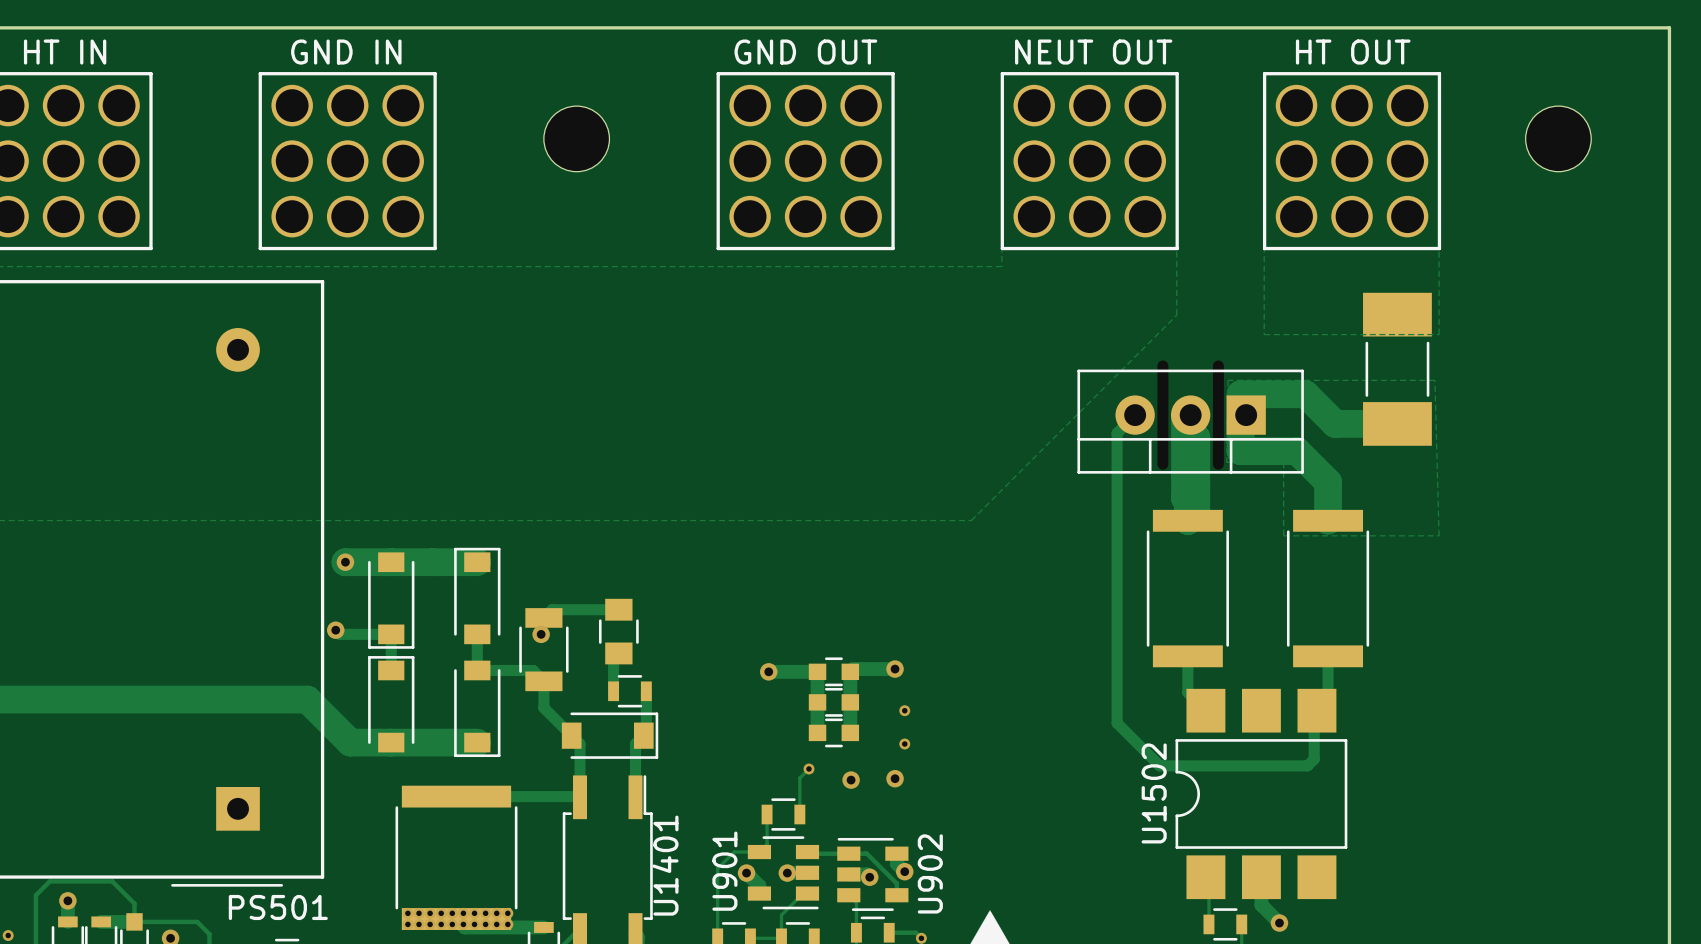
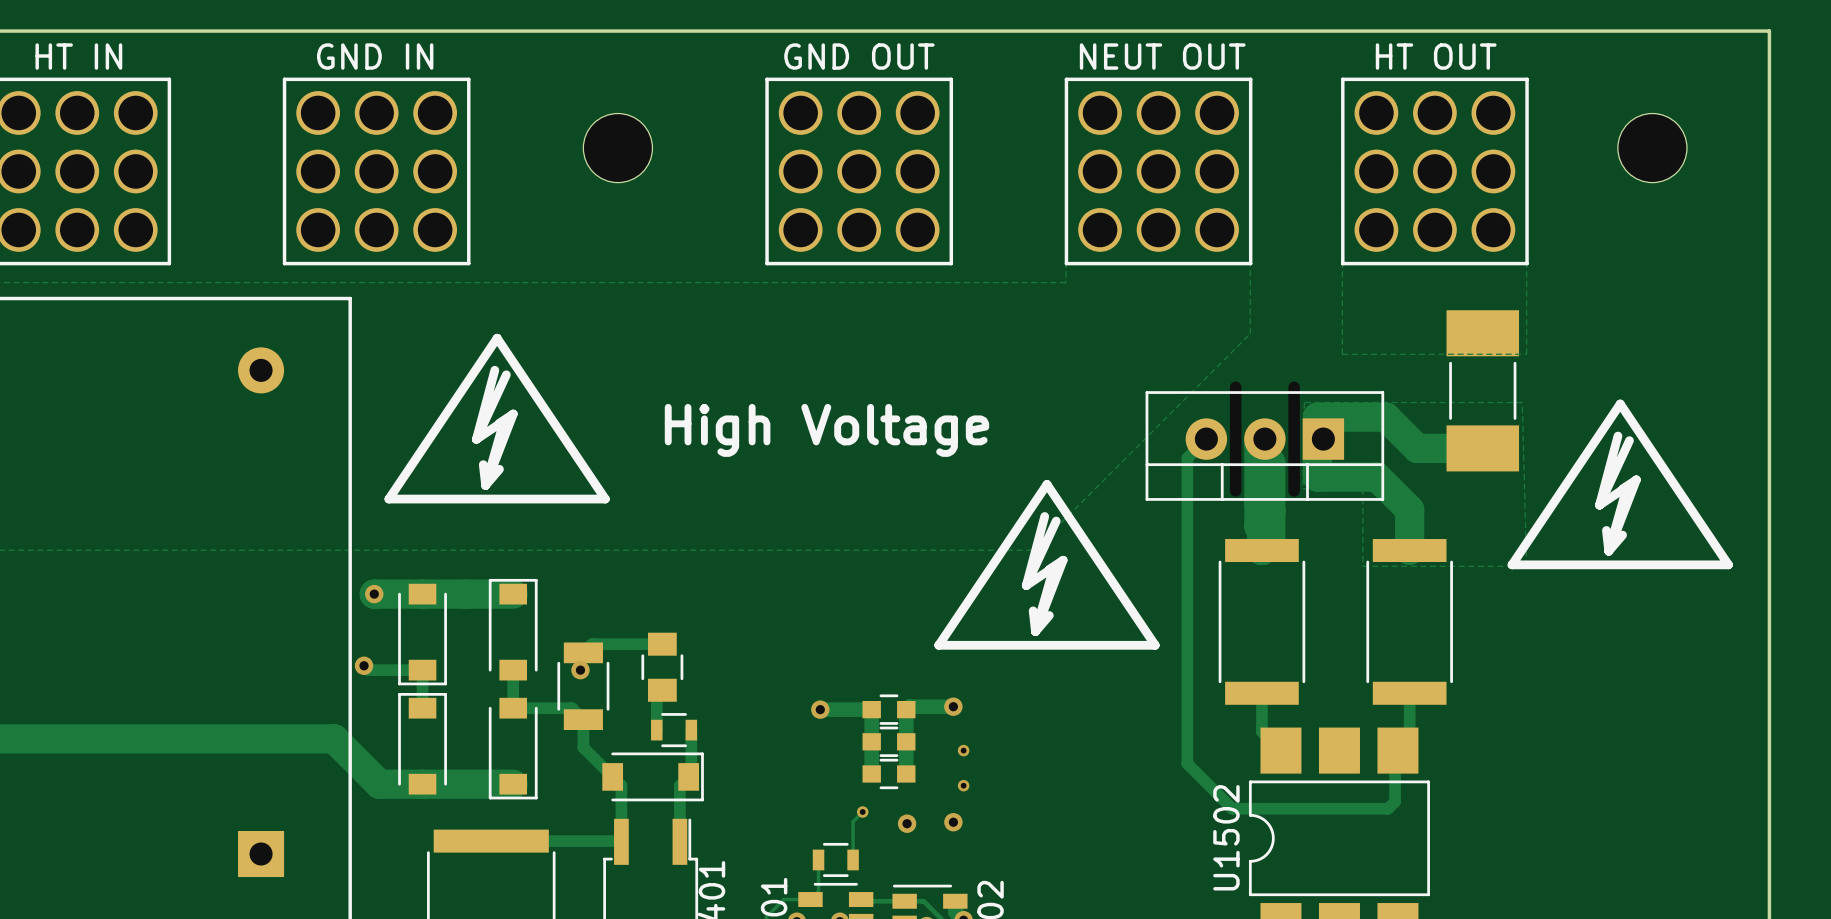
drawing: none -> [384, 333, 610, 504]
drawing: none -> [1507, 399, 1733, 570]
text: none -> High Voltage (826, 430)
drawing: none -> [934, 480, 1160, 650]

